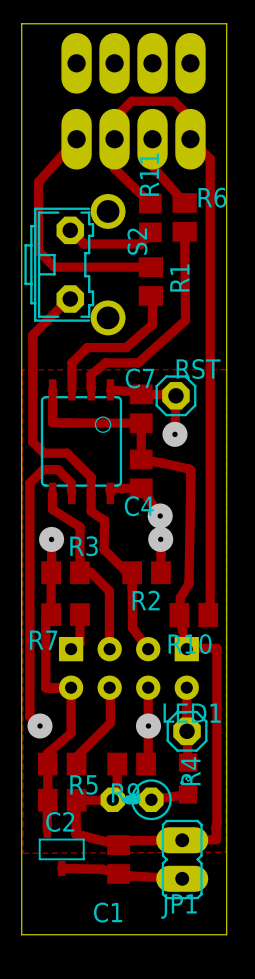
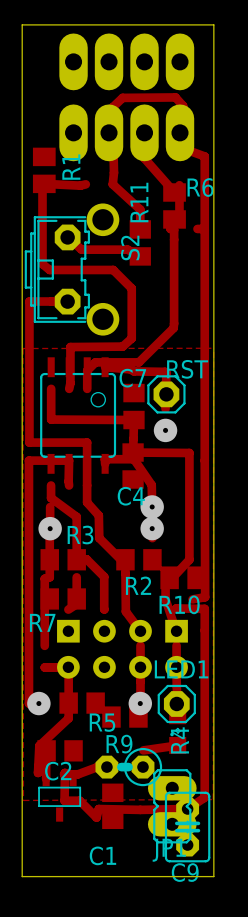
track: (76, 139) (38, 182) (38, 251) (54, 267) (150, 267) -> none
track: none -> (85, 184) (44, 183) (42, 180) (42, 264) (49, 269) (113, 269) (131, 288) (131, 338) (122, 346) (70, 347) (69, 388)
track: none -> (179, 185) (179, 216) (170, 228) (174, 229) (173, 328) (138, 362) (95, 362) (87, 370) (87, 388)
track: (150, 203) (114, 168) (114, 118) (131, 101) (174, 101) (190, 117) (190, 139) (210, 158) (210, 608) (208, 615) -> none
R11 position: (150, 217) -> (140, 242)
track: (70, 230) (83, 243) (141, 243) (150, 232) -> none
track: (184, 231) (185, 320) (138, 362) (105, 362) (91, 374) (91, 389) -> none
track: none -> (140, 229) (140, 209) (112, 184) (113, 107) (122, 97) (175, 97) (183, 105) (185, 149) (204, 156) (205, 597) (192, 599)
track: none -> (197, 228) (204, 229)
track: none -> (67, 237) (81, 249) (127, 249) (140, 256)
S2 position: (74, 264) -> (72, 269)
R1 position: (150, 281) -> (44, 170)
track: (150, 295) (152, 296) (152, 325) (126, 347) (87, 347) (71, 362) (71, 389) -> none
track: (70, 299) (32, 335) (32, 442) (43, 453) (67, 453) (91, 477) -> (67, 301) (29, 301) (29, 442) (87, 442) (87, 448)
track: (52, 389) (52, 413) -> none
RST position: (175, 395) -> (166, 394)
C7 position: (141, 408) -> (133, 406)
track: (52, 422) (141, 423) (141, 459) (190, 470) (188, 583) (180, 597) (179, 615) (186, 649) -> (51, 397) (51, 419) (133, 420) (133, 452) (189, 452) (189, 559) (165, 585) (165, 599) (176, 631)
via position: (174, 434) -> (165, 430)
C4 position: (141, 473) -> (133, 466)
track: (52, 493) (52, 509) (79, 526) (79, 550) -> (51, 485) (51, 498) (76, 516)
track: (71, 493) (71, 483) (57, 469) (43, 469) (29, 483) (29, 716) (40, 726) -> none
track: (91, 511) (104, 520) (104, 549) (127, 572) (132, 572) (132, 628) (148, 649) -> (87, 480) (87, 502) (98, 515) (99, 538) (120, 559) (125, 559) (125, 611) (140, 631)
via: (160, 515) -> none
track: none -> (69, 485) (69, 460) (28, 460) (28, 703) (38, 703)
via position: (51, 539) -> (50, 528)
via: none -> (152, 528)
R3 position: (65, 572) -> (63, 559)
track: (79, 572) (90, 572) (109, 591) (109, 614) -> (76, 538) (76, 559) (86, 559) (104, 576)
R2 position: (146, 572) -> (138, 559)
R7 position: (65, 614) -> (63, 598)
part position: (128, 668) -> (122, 649)
track: (70, 687) (45, 687) (71, 687) (71, 733) (47, 753) (47, 800) (50, 792) -> none
track: (109, 687) (110, 723) (76, 756) (76, 764) -> none
track: none -> (68, 667) (44, 667) (68, 667) (68, 718) (39, 745) (38, 772) (39, 762)
via position: (40, 726) -> (38, 703)
via position: (148, 726) -> (140, 703)
part position: (187, 731) -> (176, 703)
R5 position: (62, 764) -> (82, 703)
track: (117, 764) (117, 795) (112, 800) (76, 800) (75, 833) (118, 845) (108, 840) (216, 839) (216, 823) -> (106, 767) (96, 767) (78, 774) (64, 774) (64, 772) (64, 800) (79, 800) (96, 817) (98, 809) (187, 808) (203, 798) (204, 772)
R4 position: (136, 799) -> (128, 767)
track: (61, 868) (101, 869) (130, 875) (182, 878) -> none
C9: none -> (187, 827)

